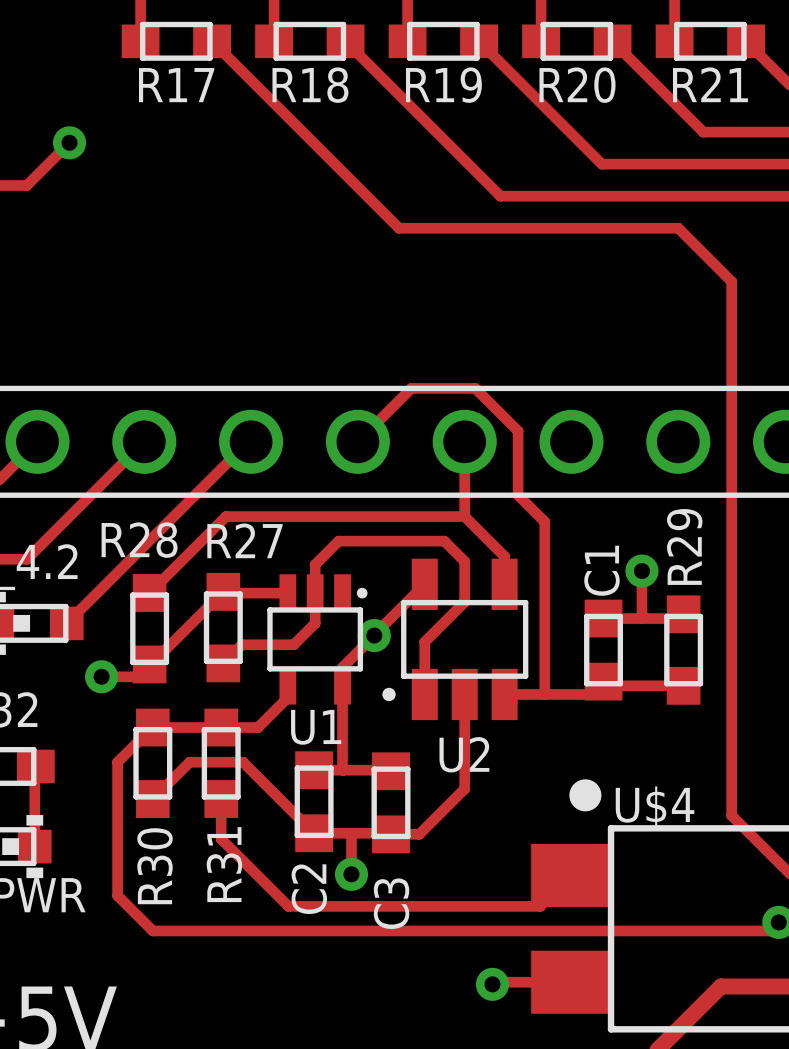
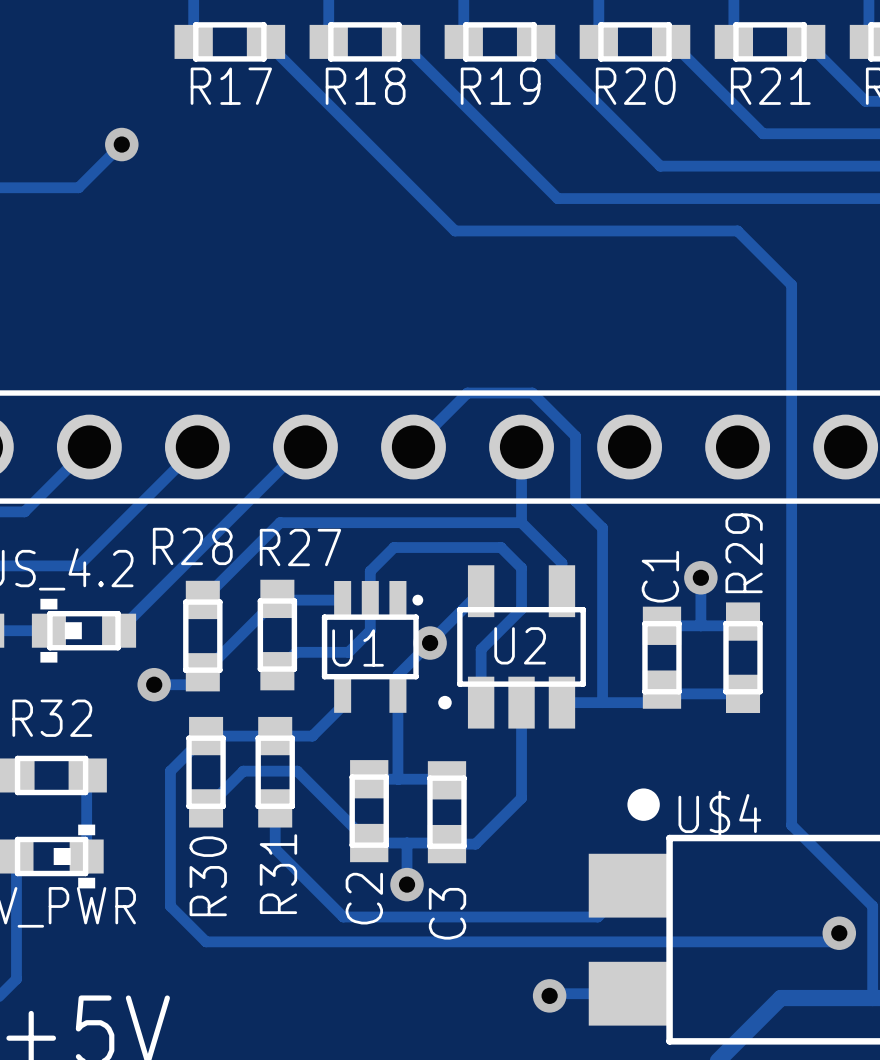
U1 name position: U1 (316, 727) -> U1 (358, 647)
U2 name position: U2 (464, 754) -> U2 (520, 645)

